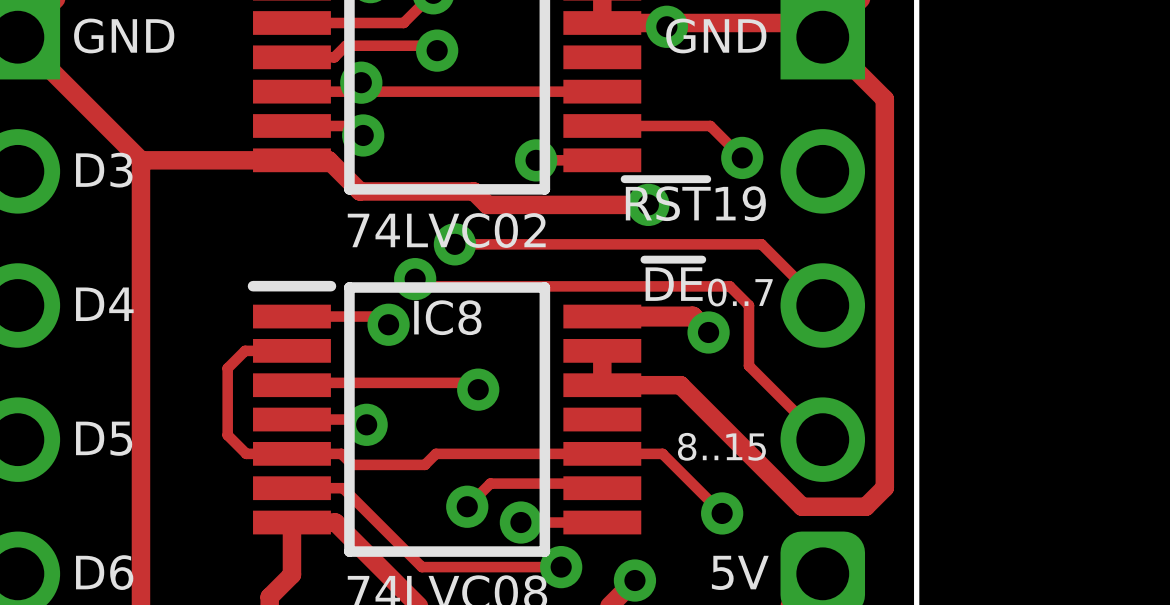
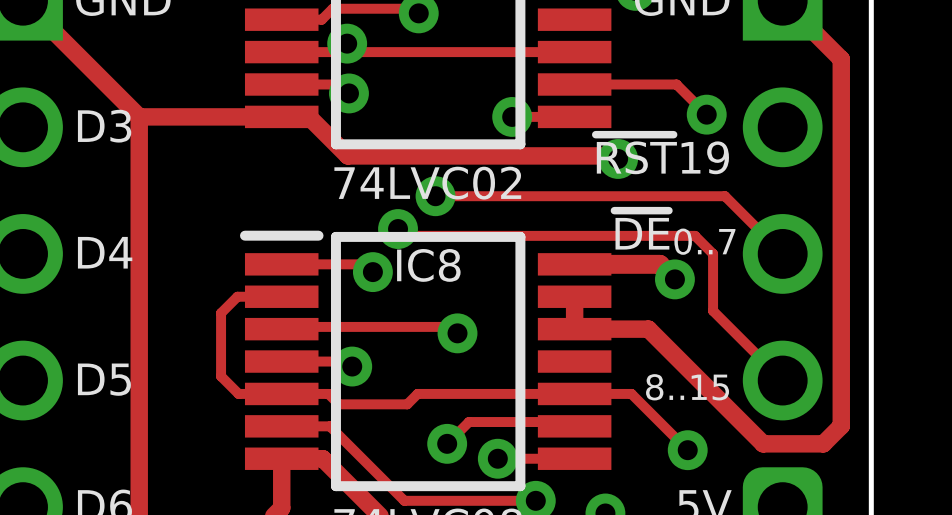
track: (291, 160) (328, 160) (359, 191) (473, 191) (487, 204) (648, 204) -> none
track: none -> (308, 116) (347, 155) (622, 155)

